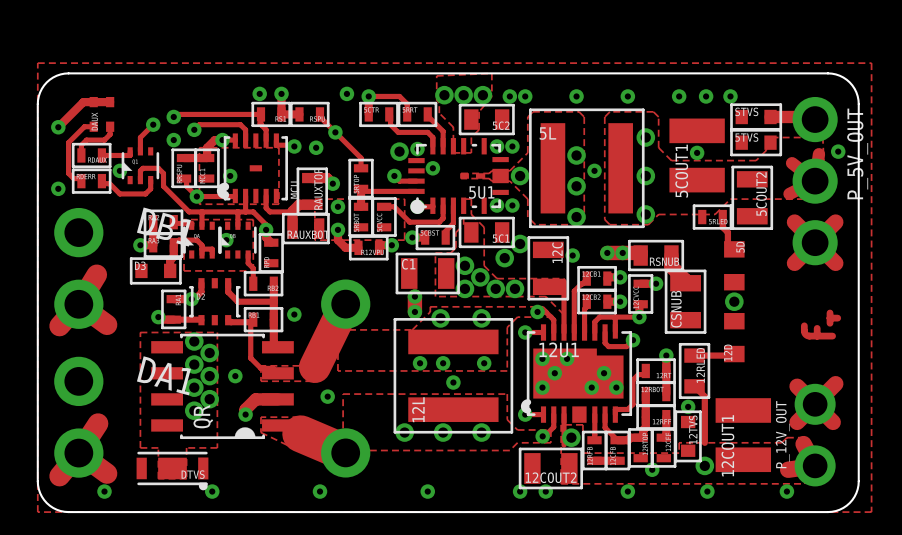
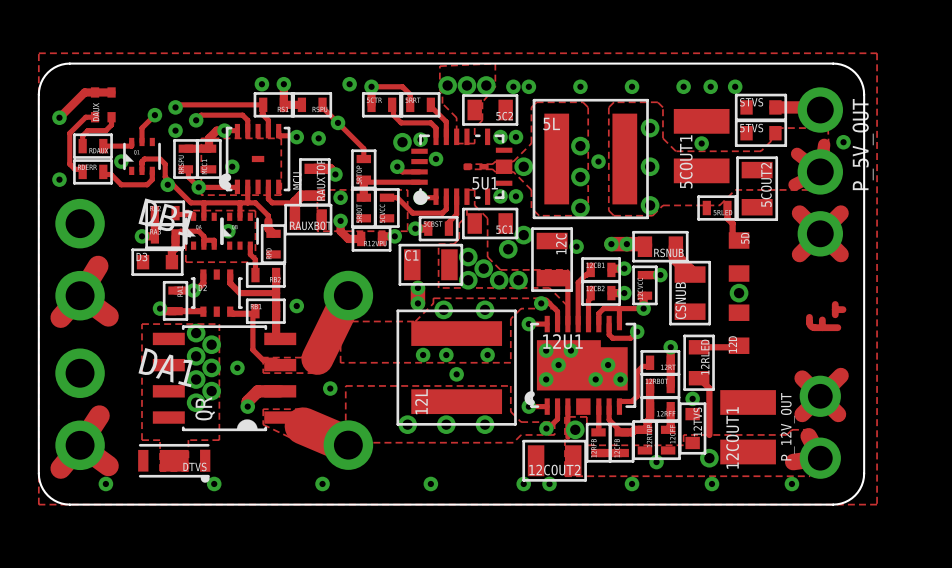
via position: (266, 229) -> (167, 184)

